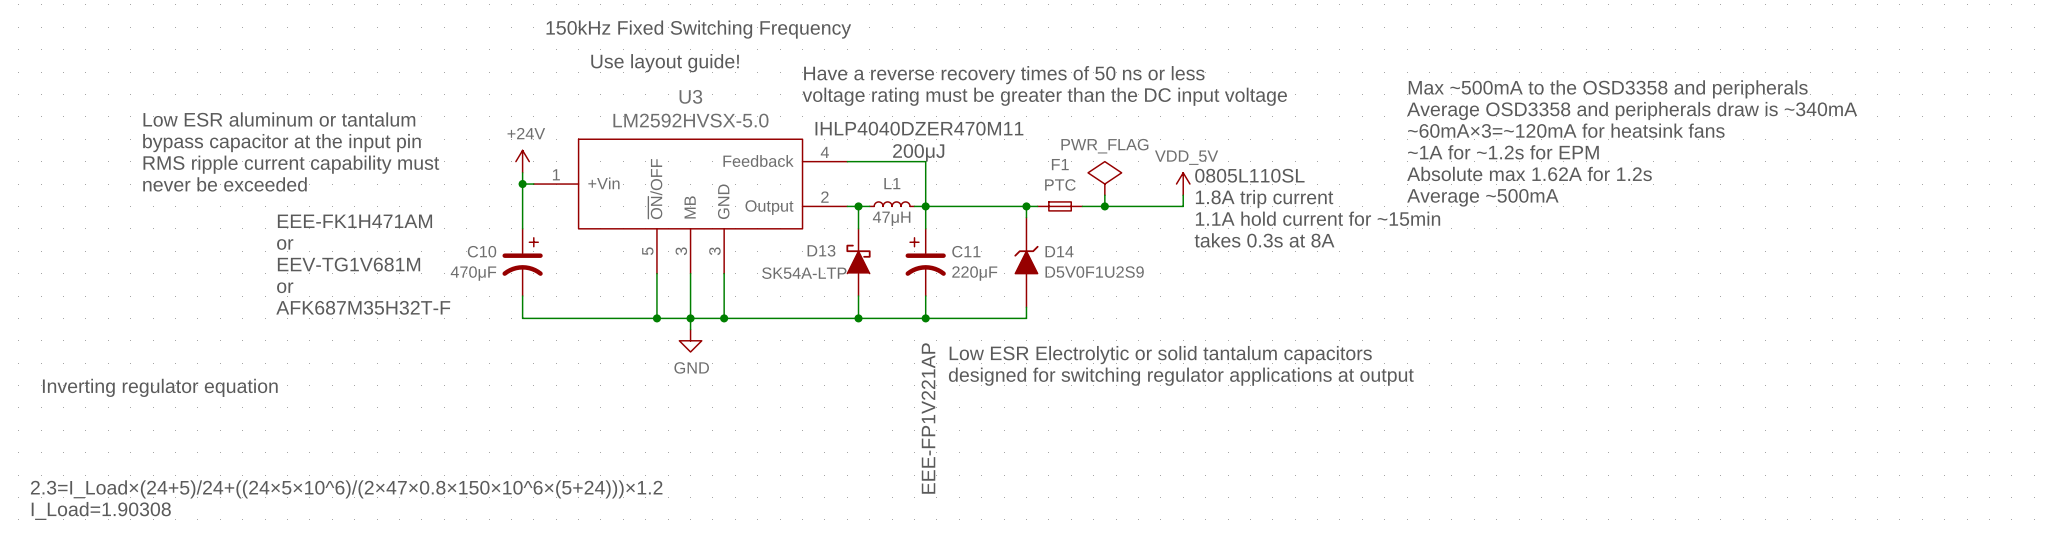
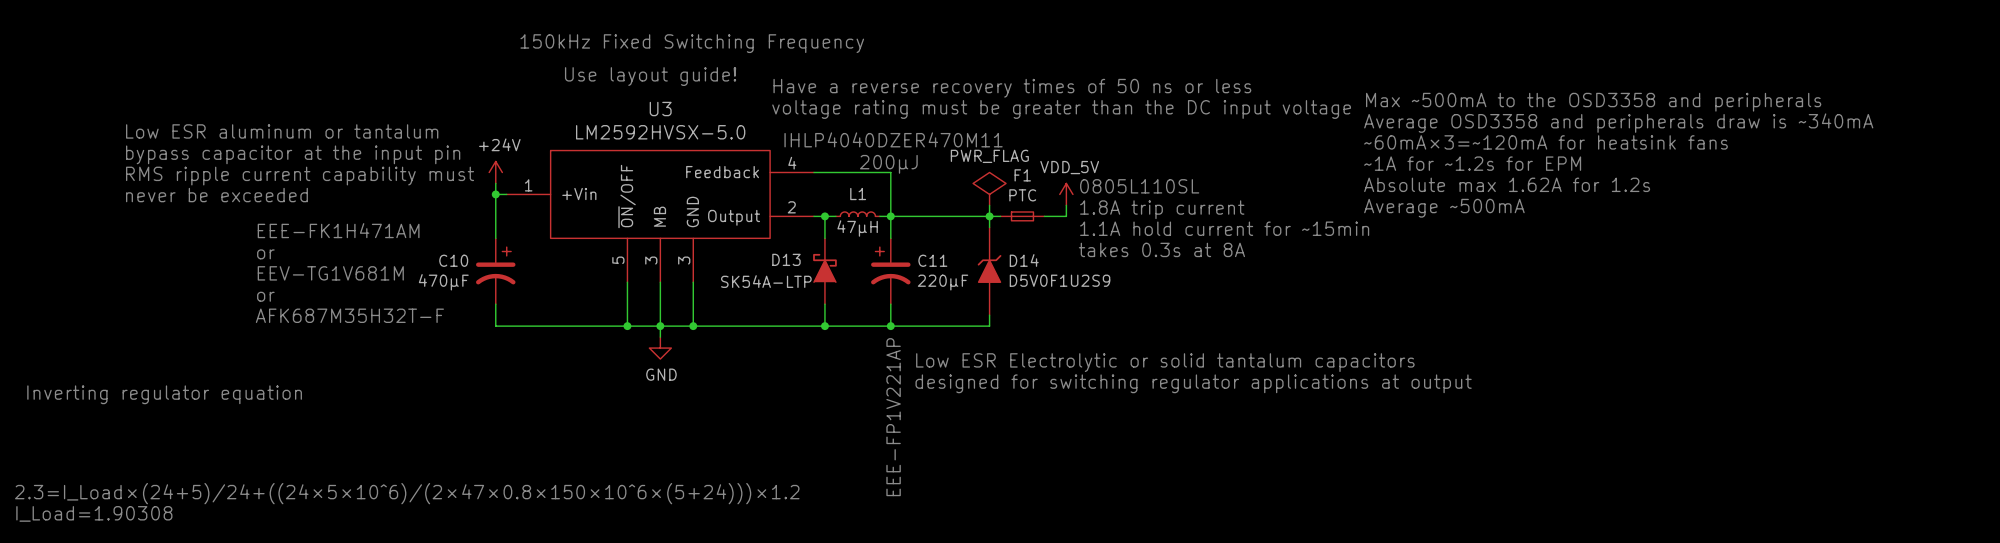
text position: 0805L110SL (1249, 175) -> 0805L110SL (1139, 186)
power symbol: none -> PWR_FLAG (989, 188)
power symbol: PWR_FLAG (1104, 178) -> VDD_5V (1066, 194)
power symbol: VDD_5V (1183, 184) -> none
wire: none -> (989, 205) (989, 216)
wire: (1183, 195) (1183, 206) (1104, 206) -> none
text position: 1.8A trip current (1264, 199) -> 1.8A trip current (1162, 209)
junction: (1104, 206) -> none
text position: 1.1A hold current for ~15min (1318, 218) -> 1.1A hold current for ~15min (1224, 228)
text position: takes 0.3s at 8A (1264, 240) -> takes 0.3s at 8A (1161, 249)

